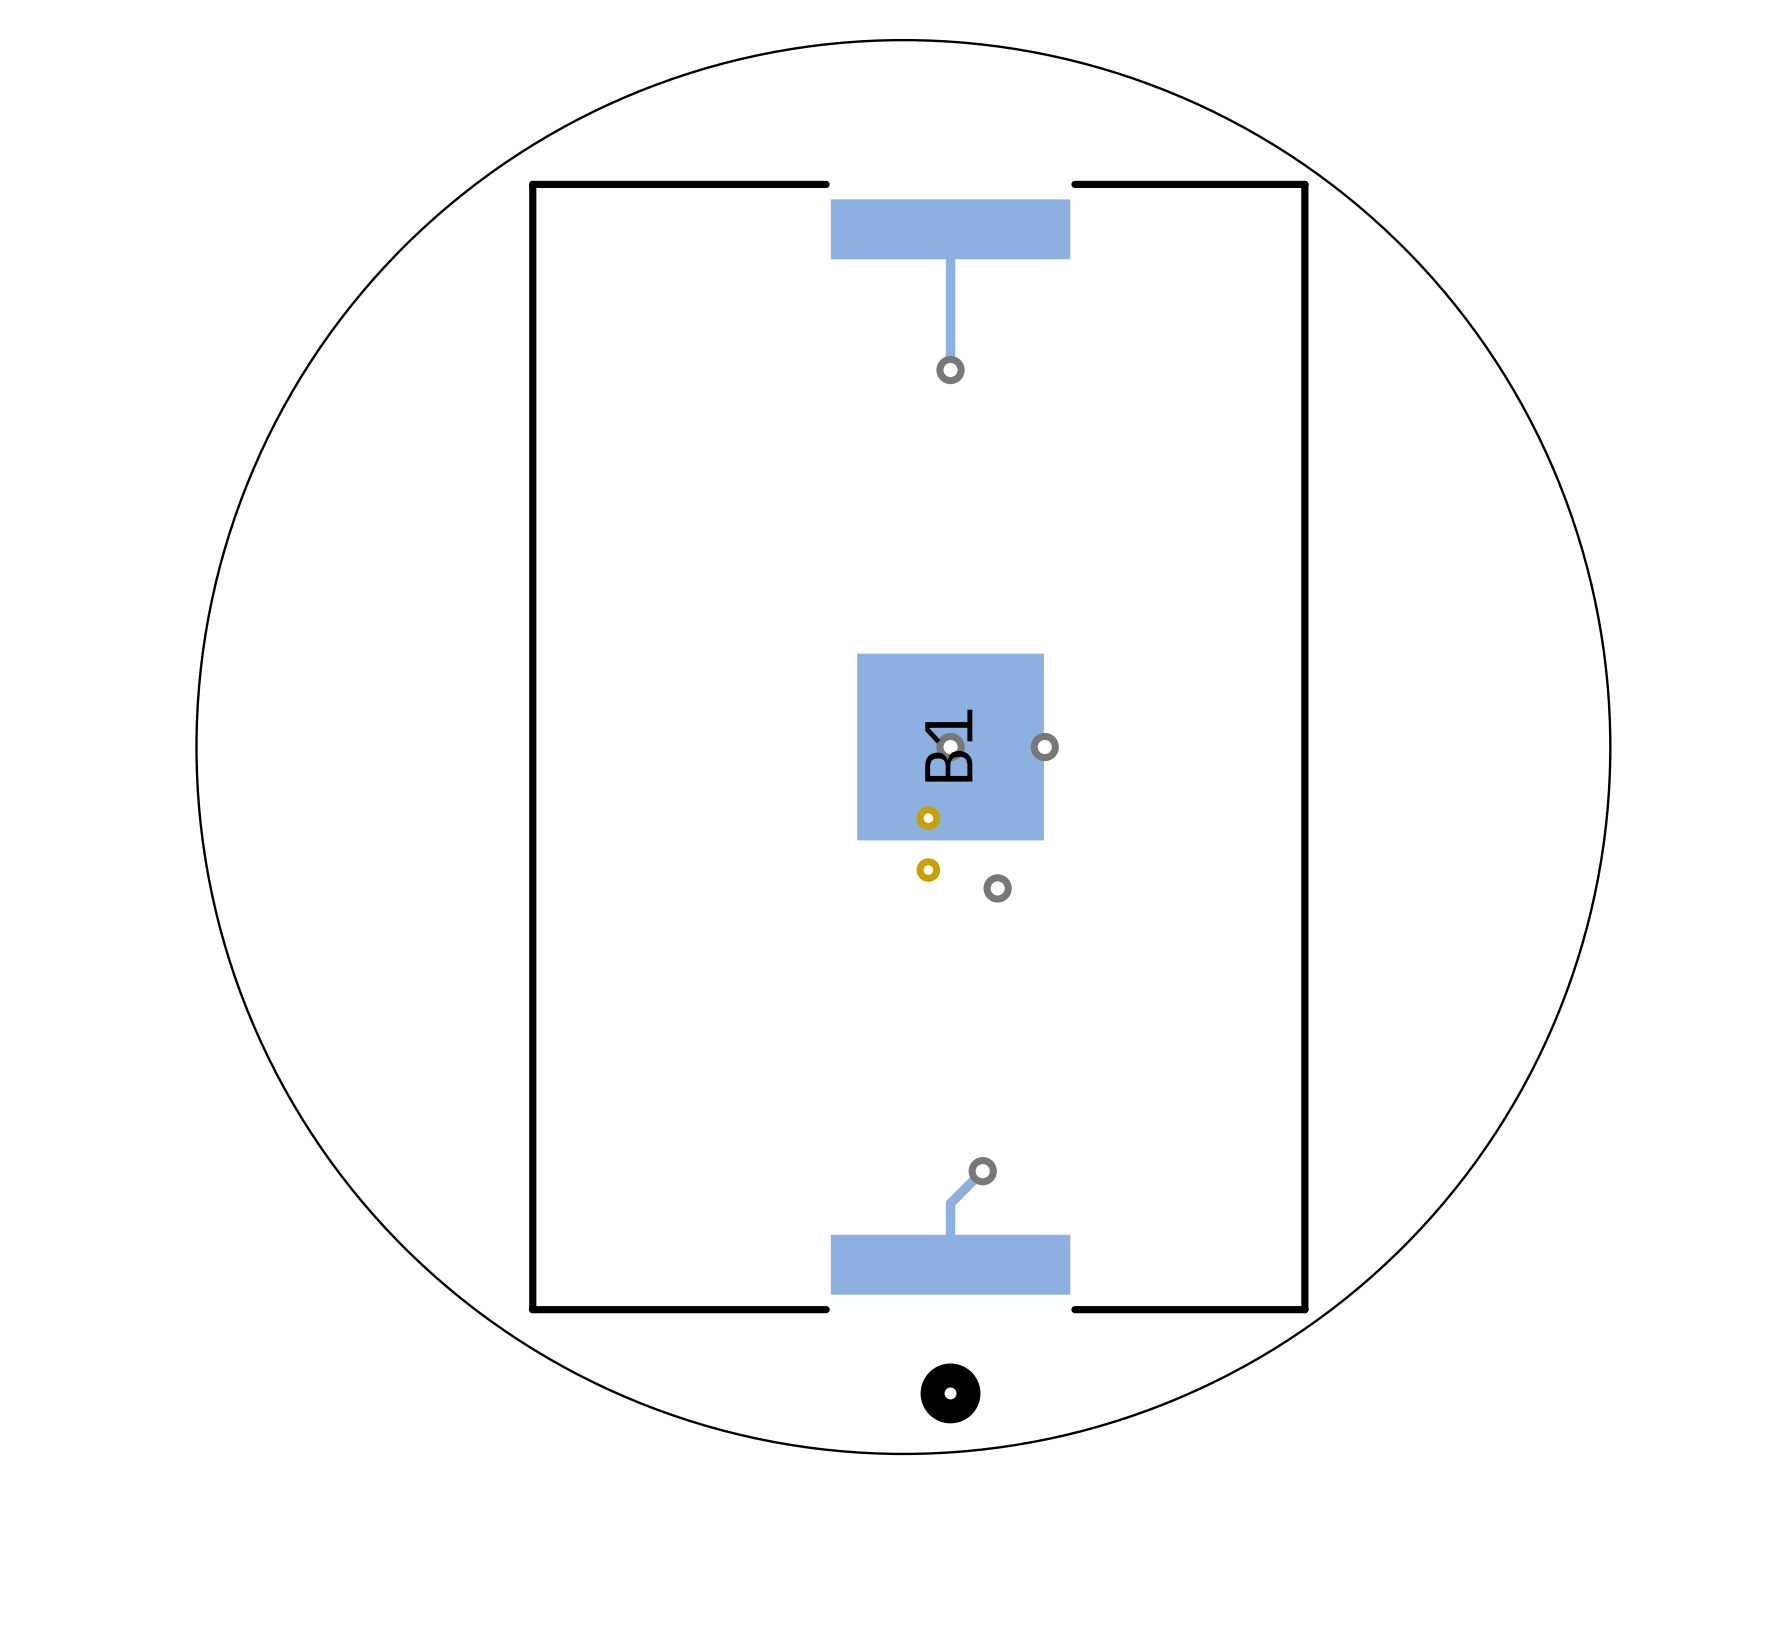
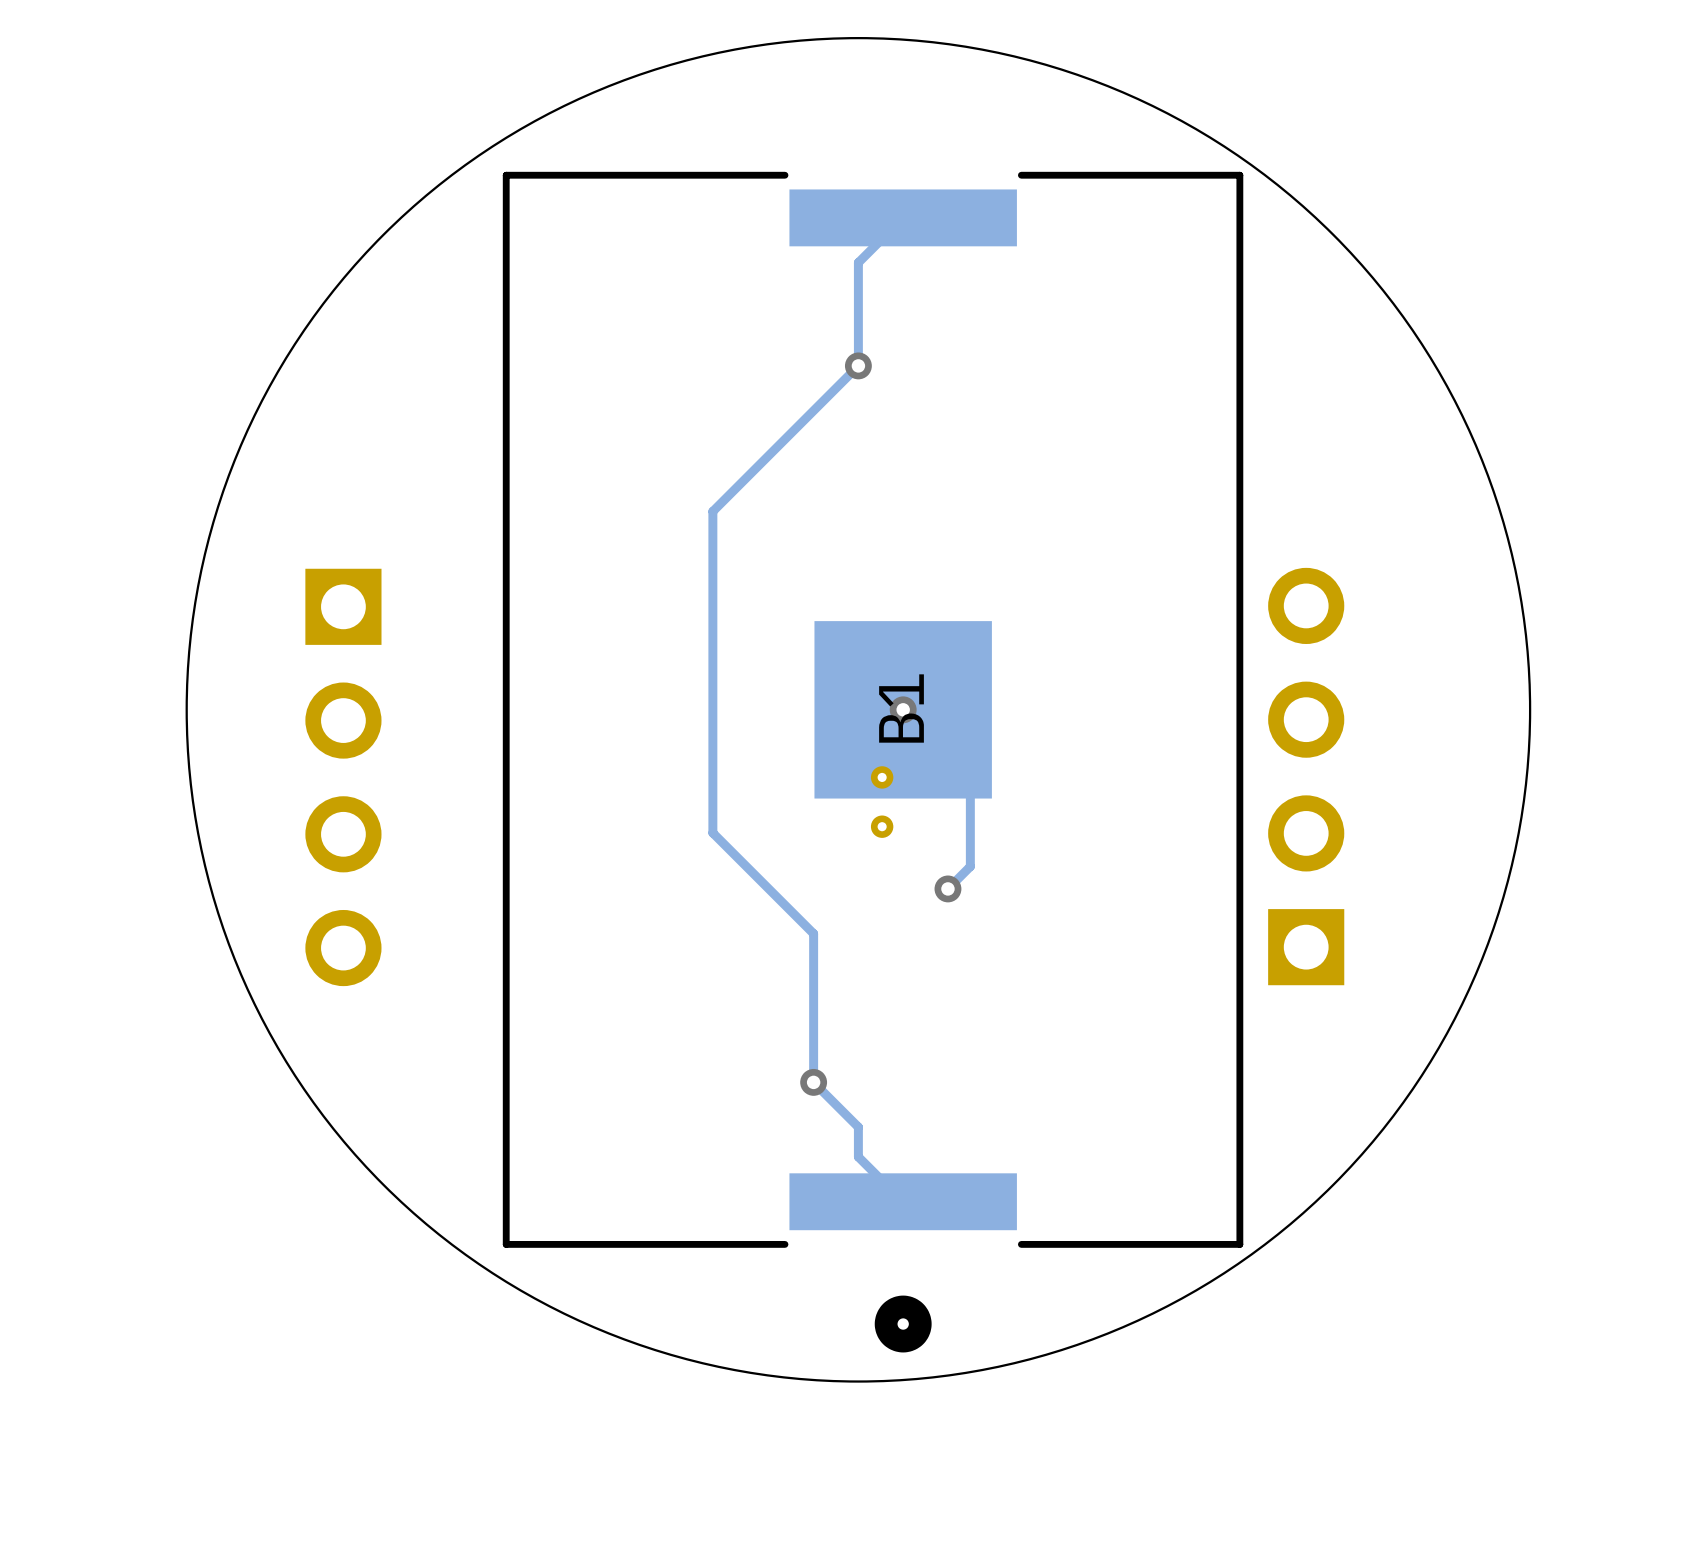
track: (950, 229) (950, 370) -> (903, 217) (858, 262) (858, 365) (712, 511) (712, 832) (813, 933) (813, 1082) (858, 1127) (858, 1156) (903, 1201)
via position: (950, 370) -> (858, 365)
track: none -> (903, 709) (970, 776) (970, 866) (947, 888)
via: (1044, 747) -> none
part: none -> (1306, 776)
part: none -> (343, 777)
via position: (997, 888) -> (947, 888)
via: none -> (813, 1082)
track: (982, 1171) (950, 1203) (950, 1264) -> none
via: (982, 1171) -> none

